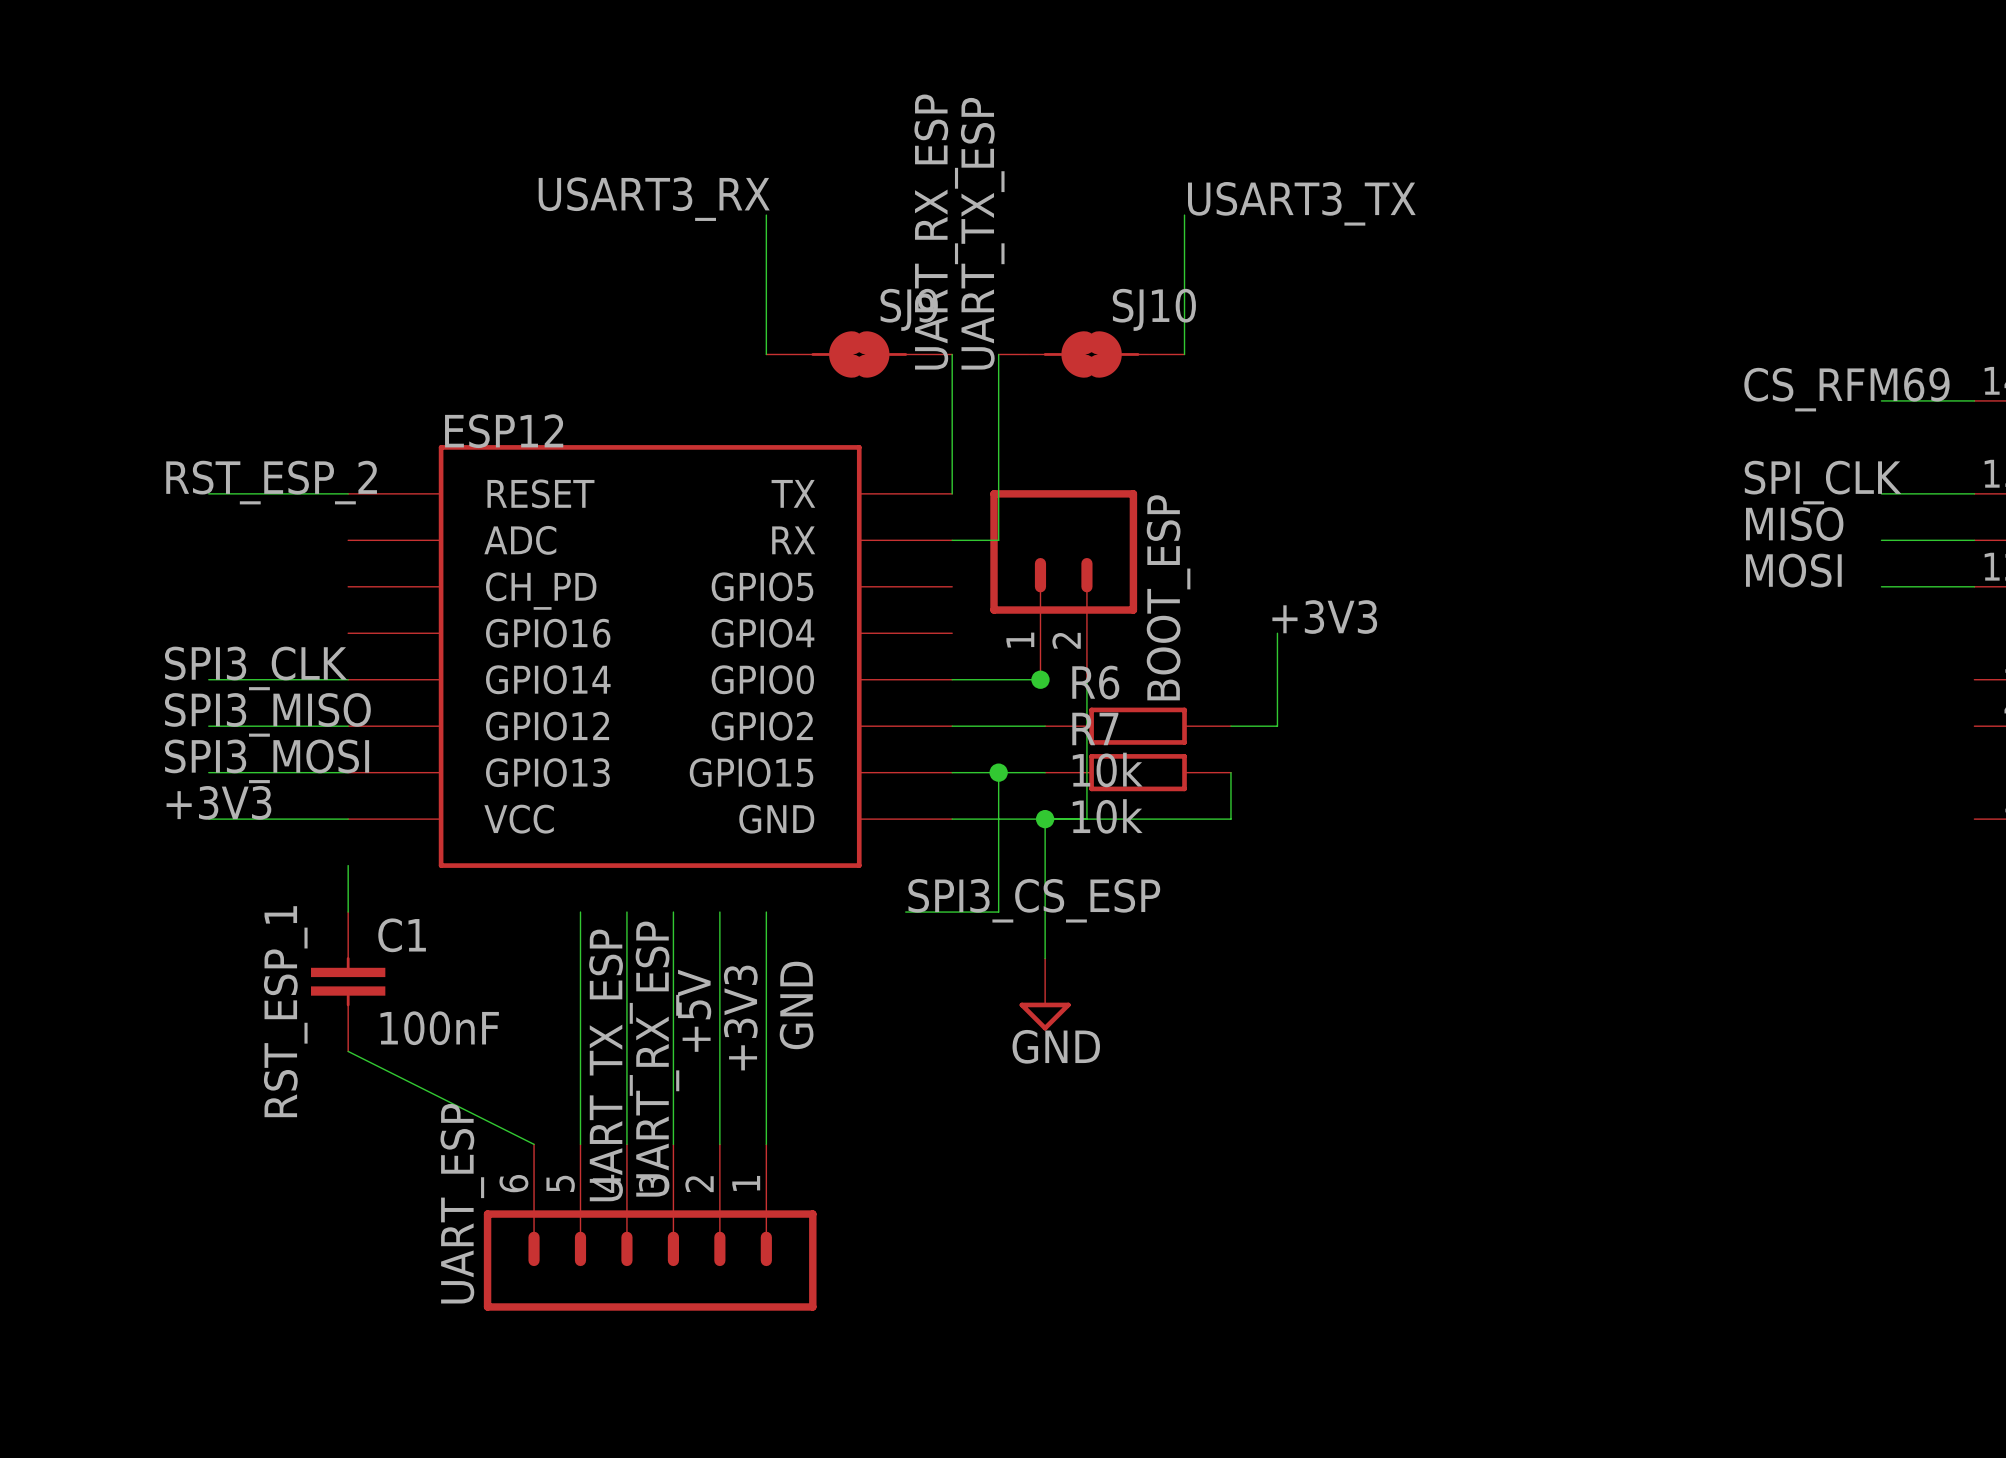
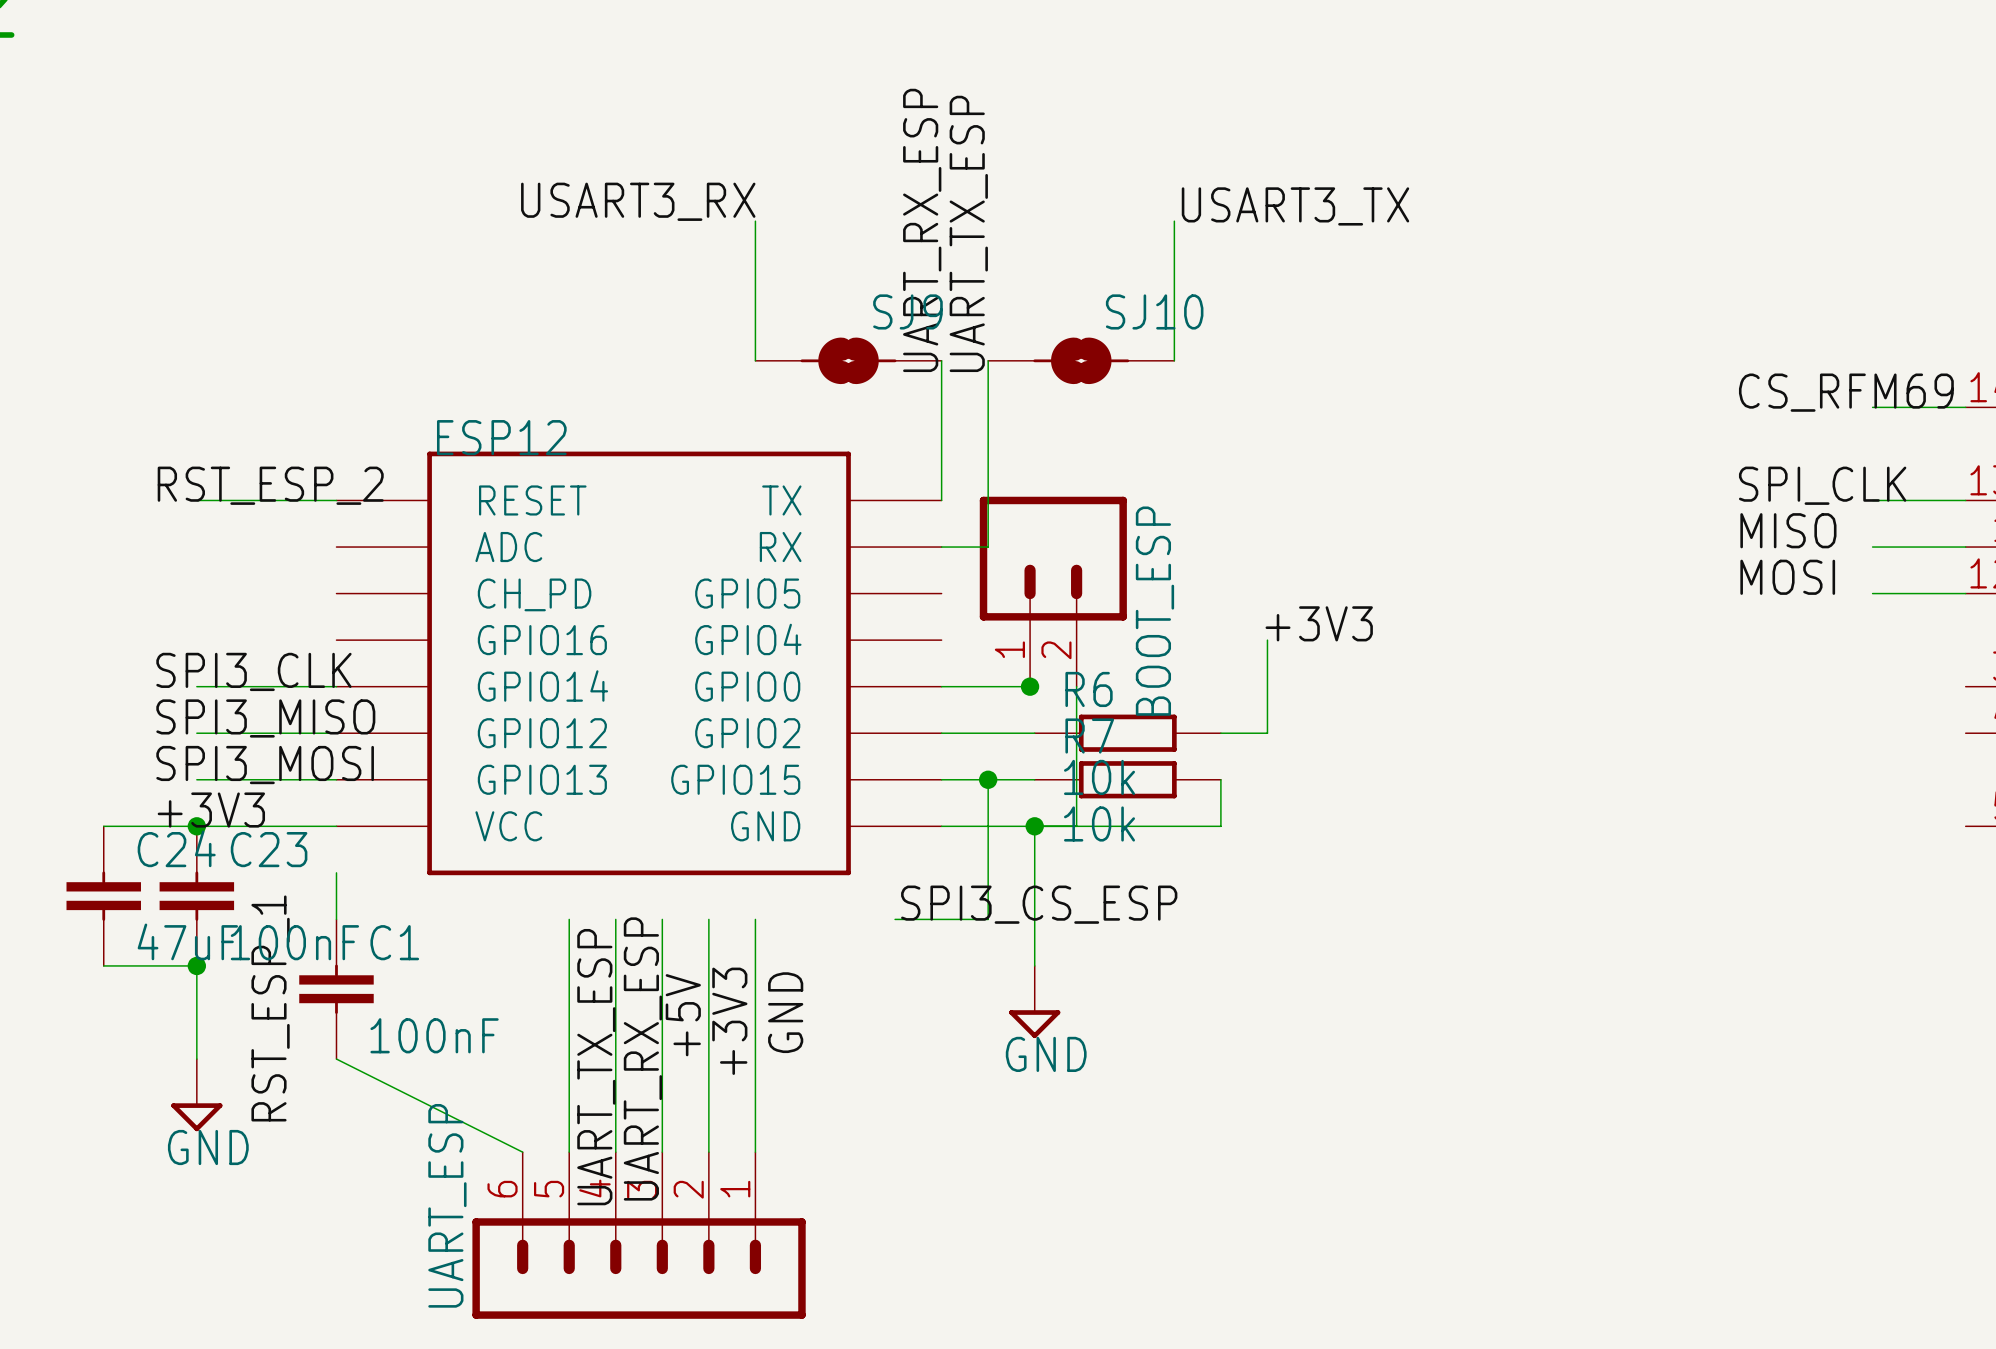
wire: none -> (103, 826) (196, 826)
junction: none -> (196, 826)
C24: none -> 47uF (103, 896)
C23: none -> 100nF (196, 896)
wire: none -> (103, 965) (196, 965) (196, 1059)
junction: none -> (196, 965)
power symbol: none -> GND (196, 1095)

